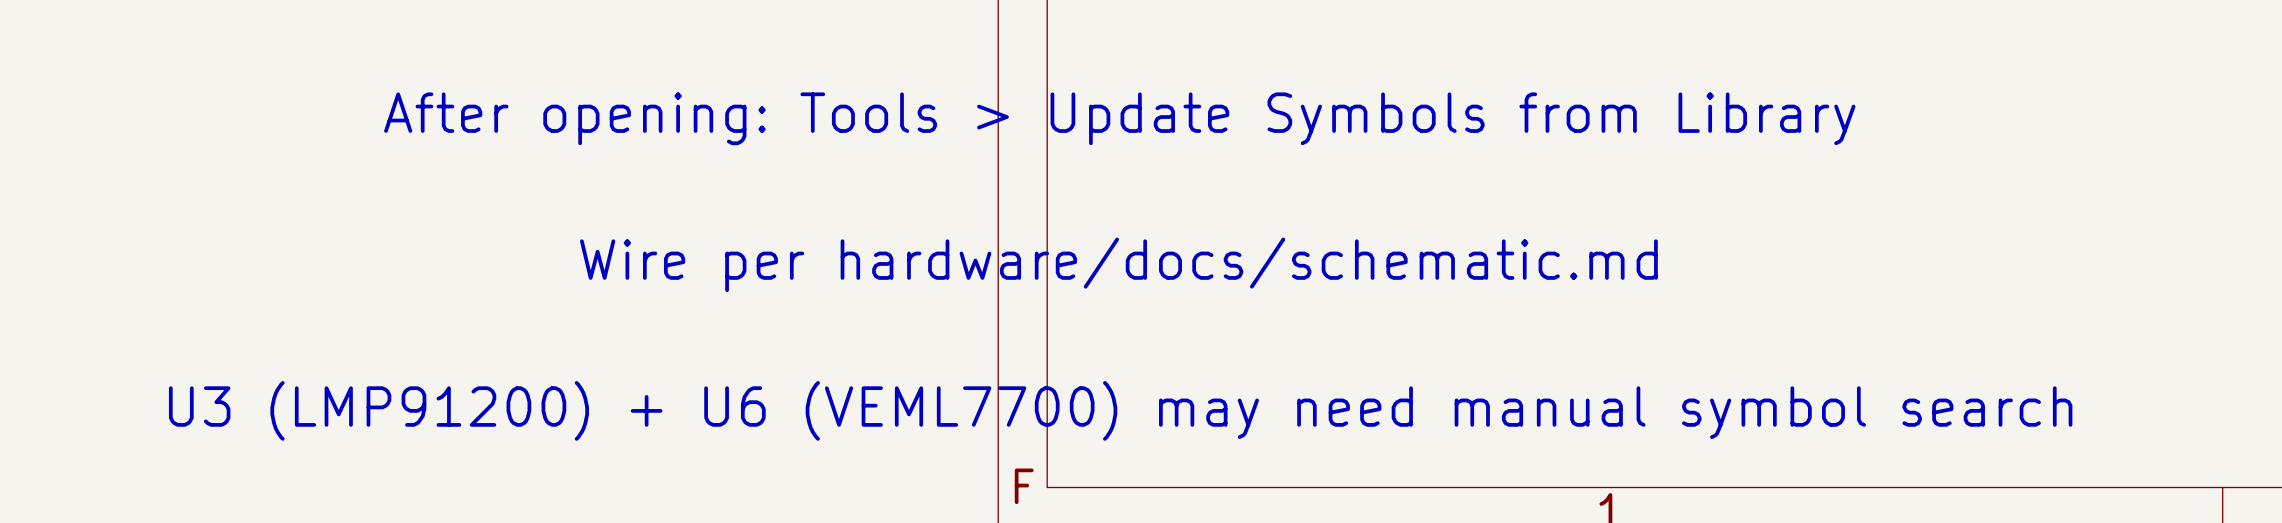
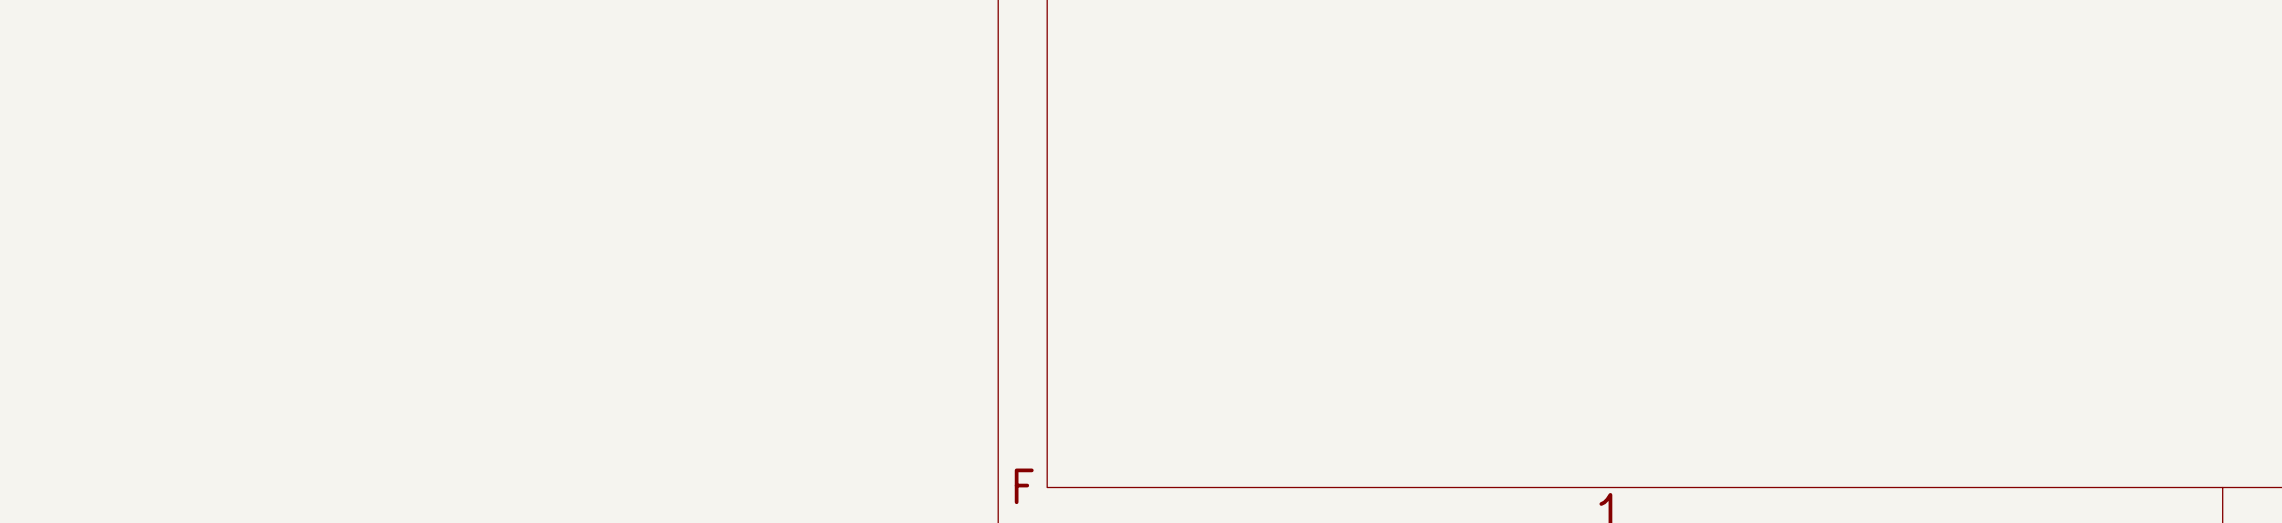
text: After opening: Tools > Update Symbols from Library (1119, 118) -> none
text: Wire per hardware/docs/schematic.md (1118, 264) -> none
text: U3 (LMP91200) + U6 (VEML7700) may need manual symbol search (1120, 410) -> none

